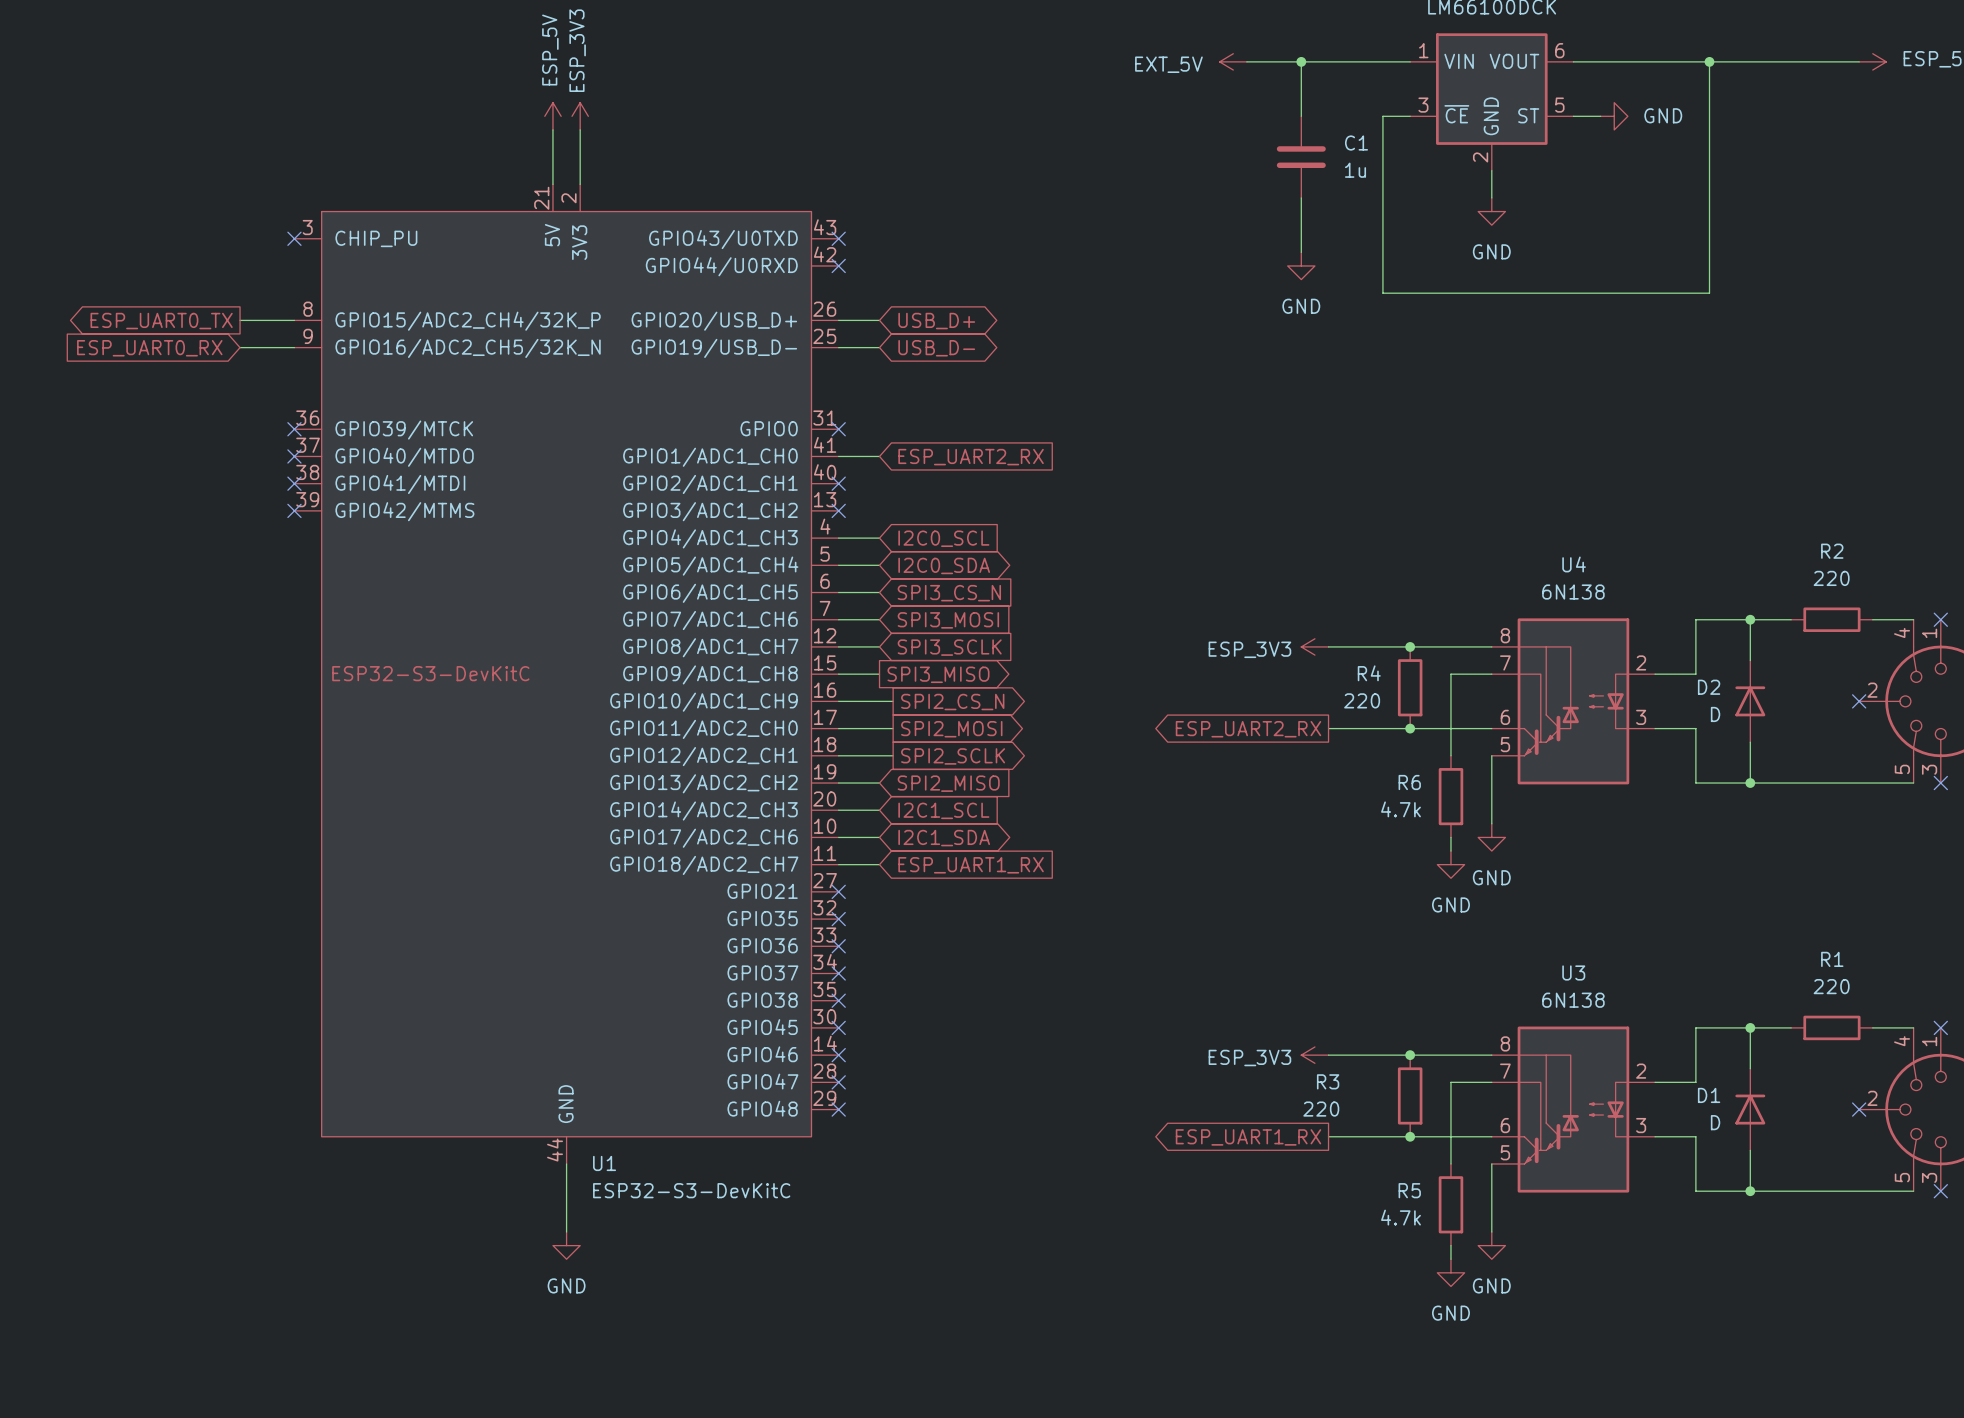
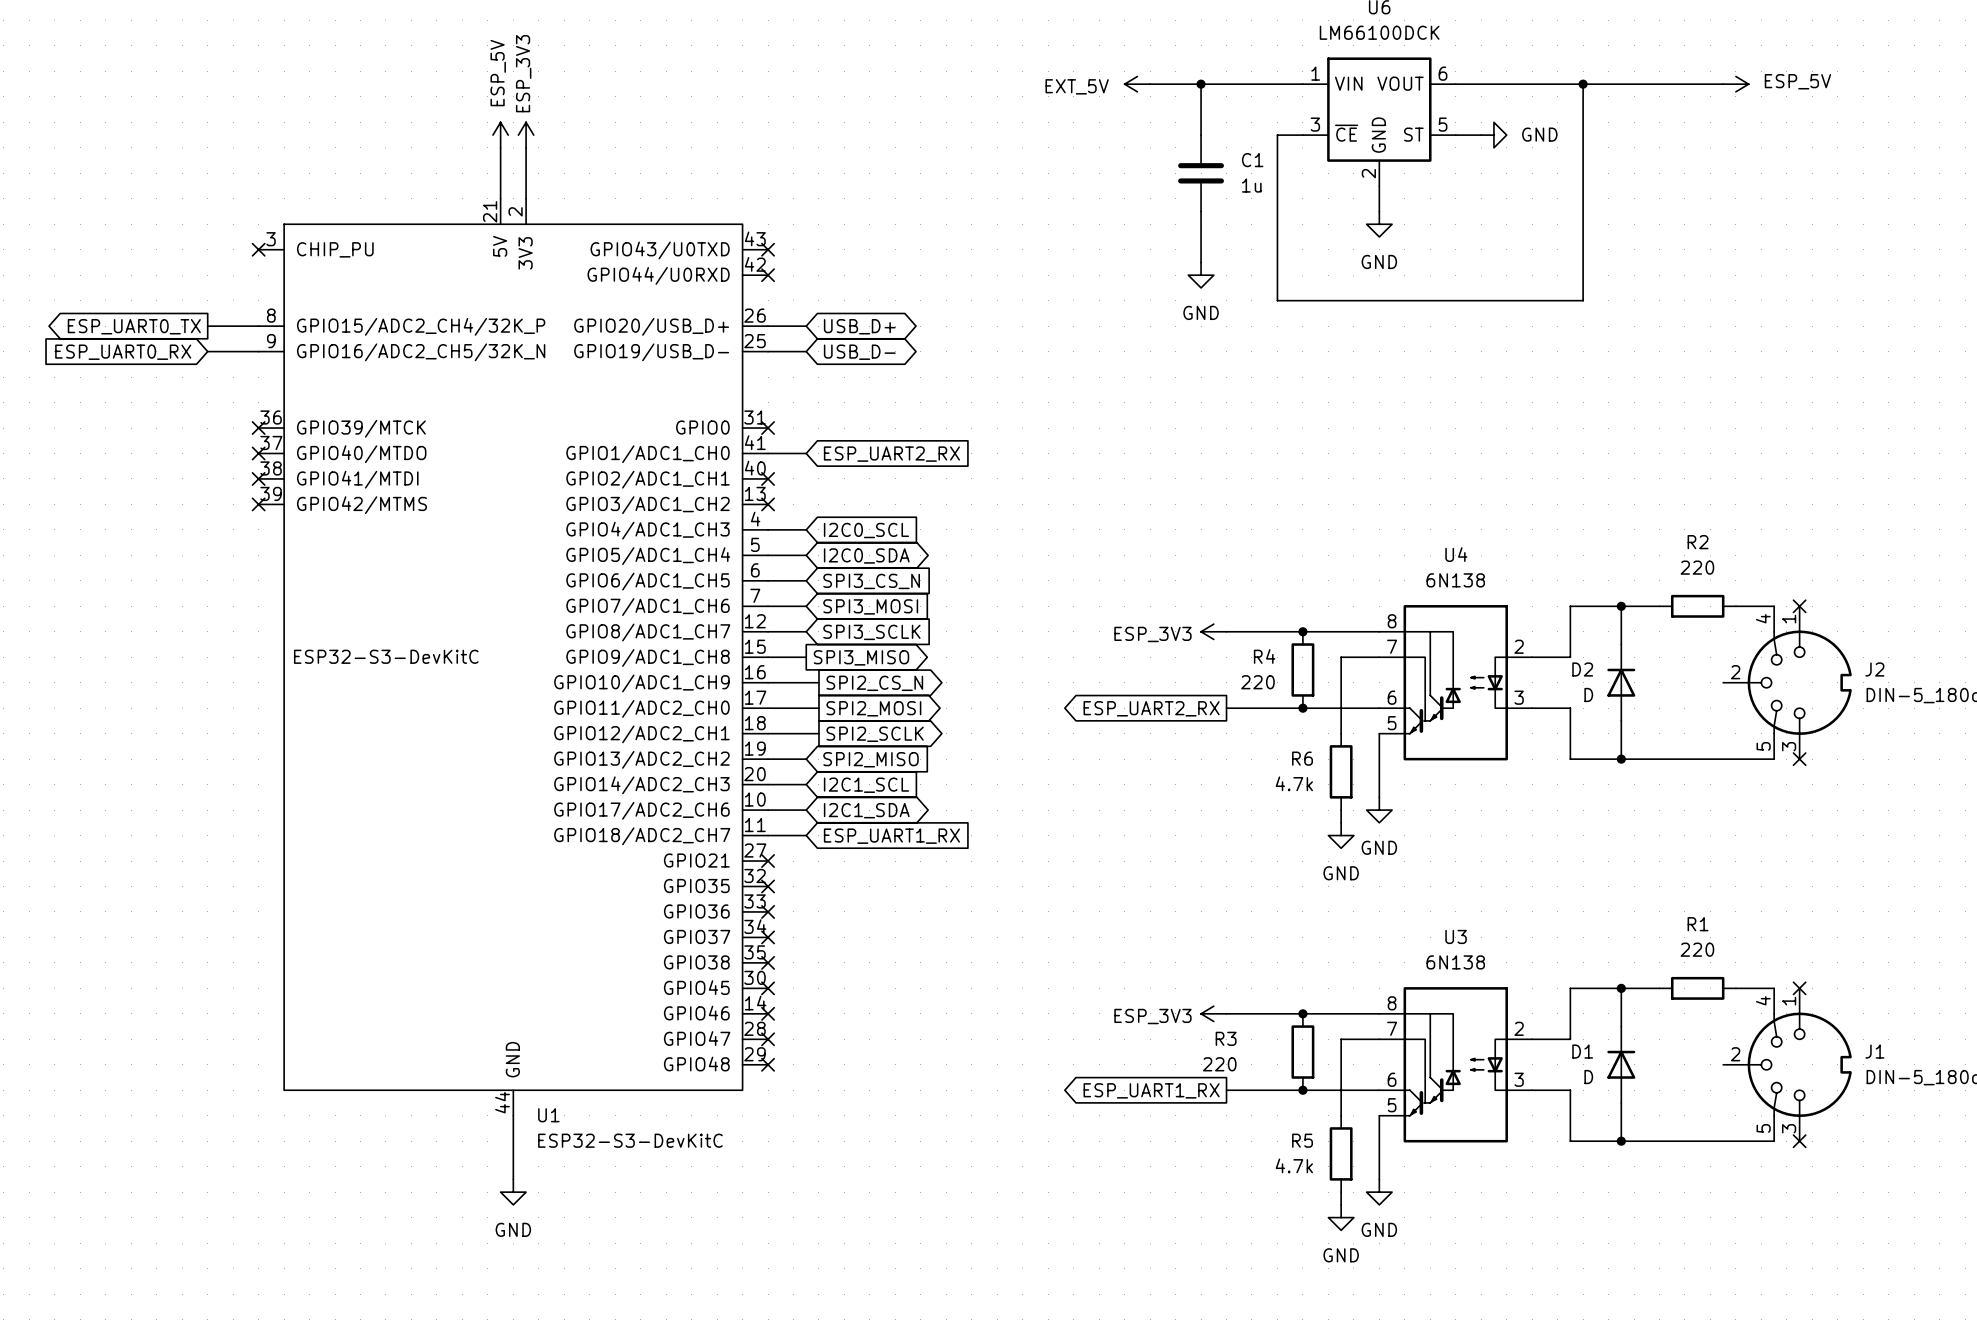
no-connect mark: (1859, 701) -> none
no-connect mark: (1859, 1109) -> none

